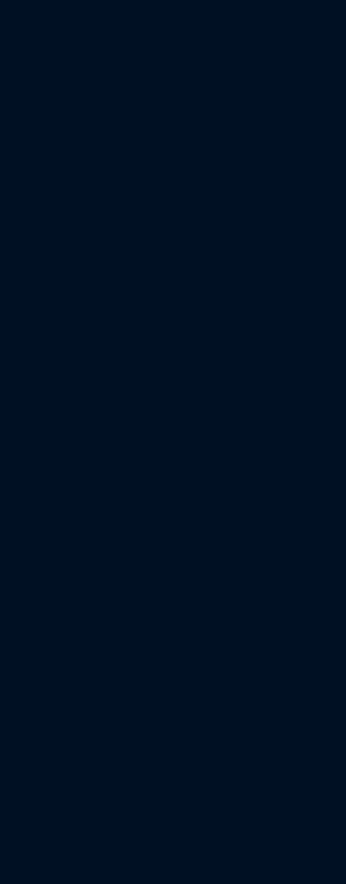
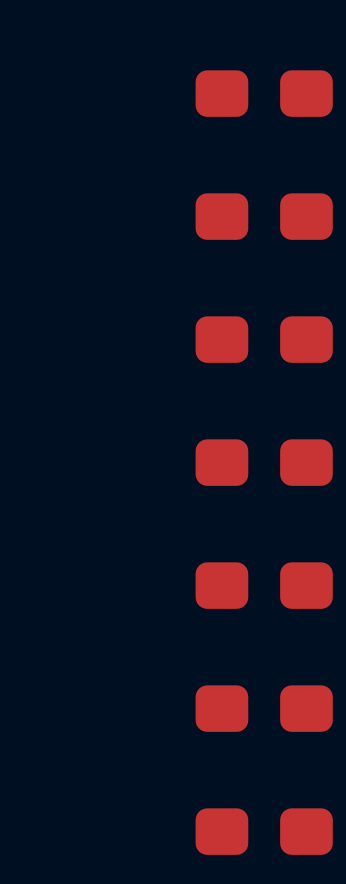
part: none -> (264, 93)
part: none -> (264, 216)
part: none -> (264, 339)
part: none -> (264, 462)
part: none -> (264, 585)
part: none -> (264, 708)
part: none -> (264, 831)

